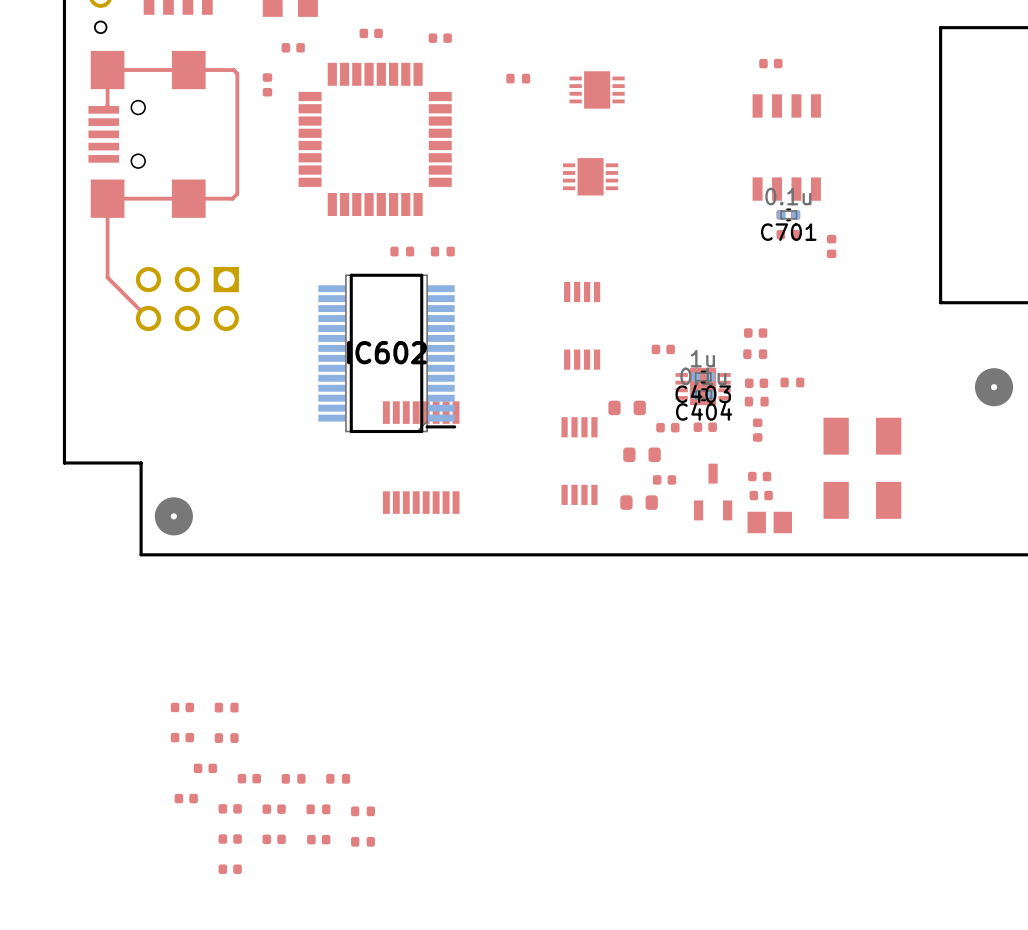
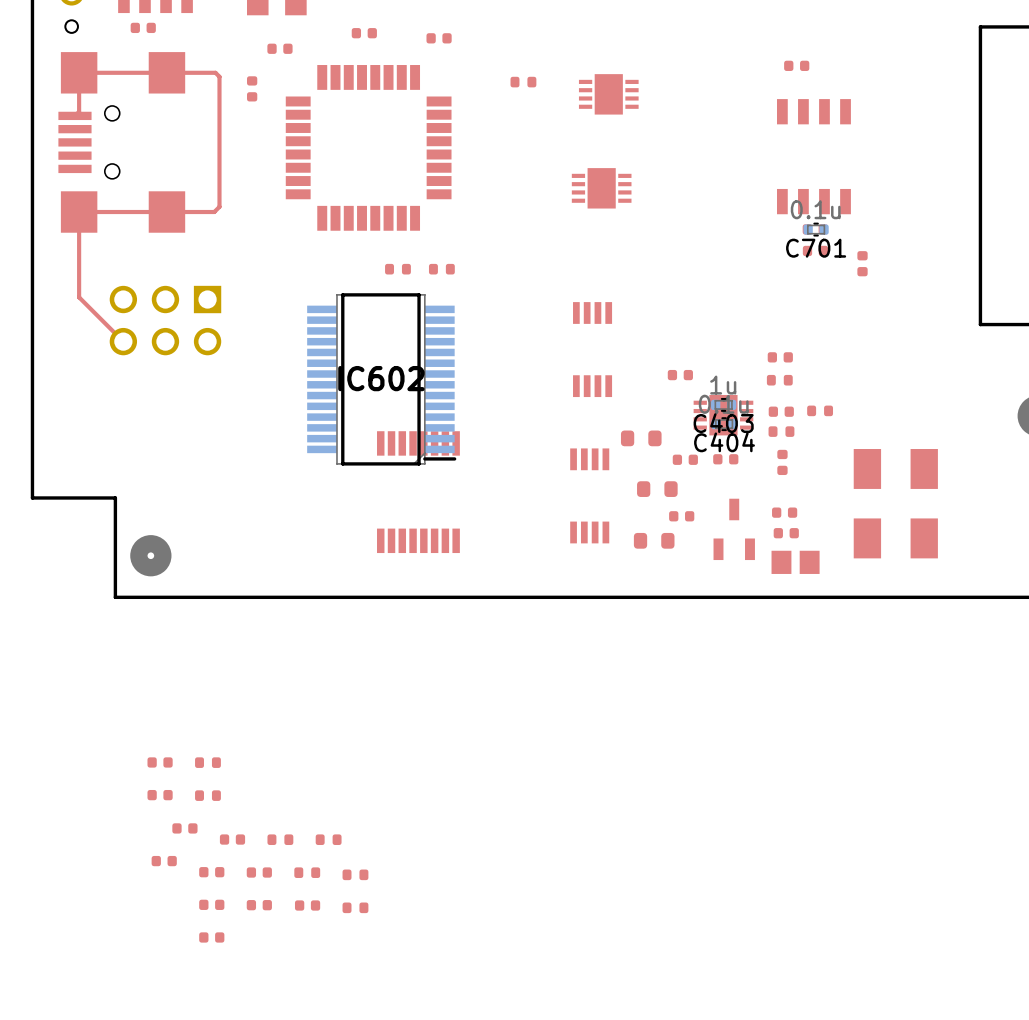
part: none -> (143, 27)

